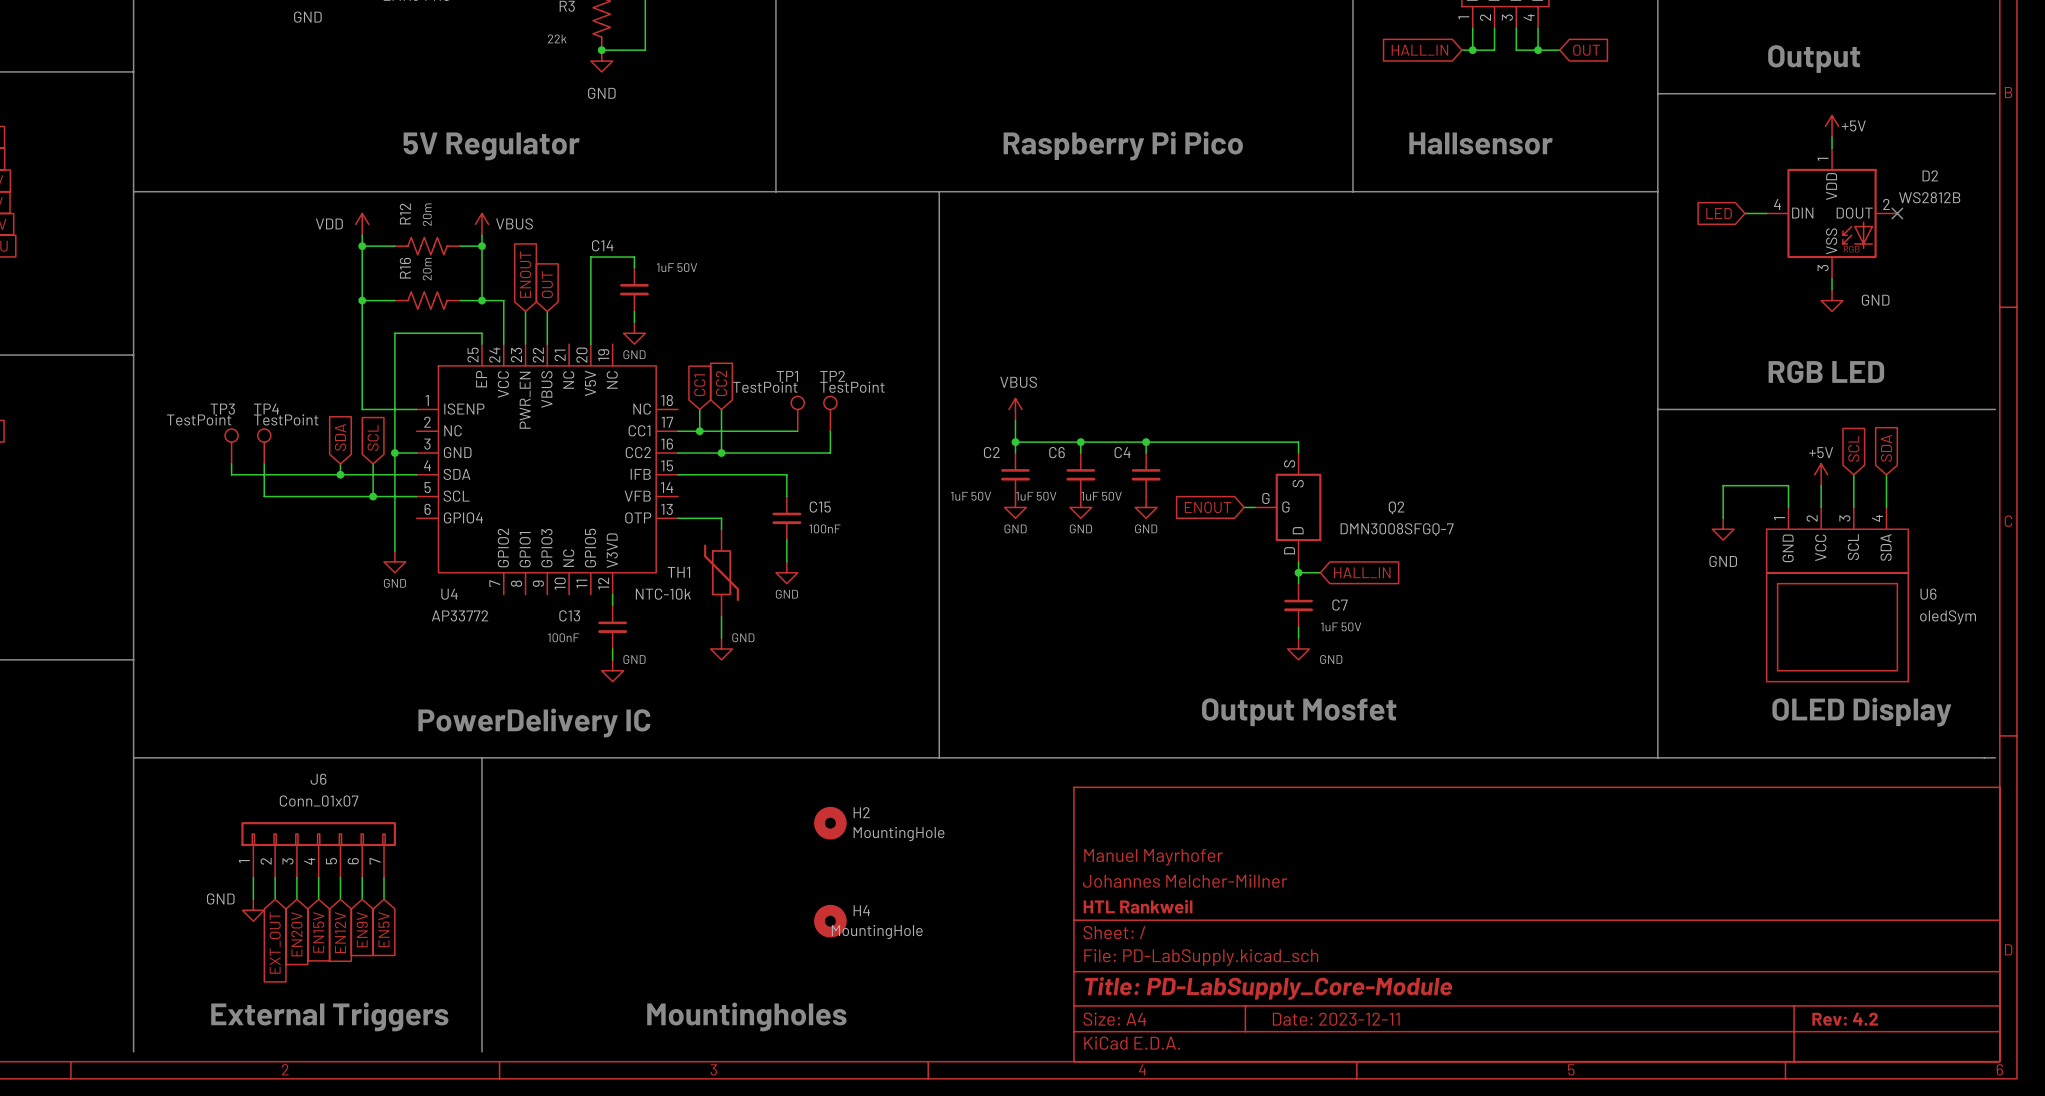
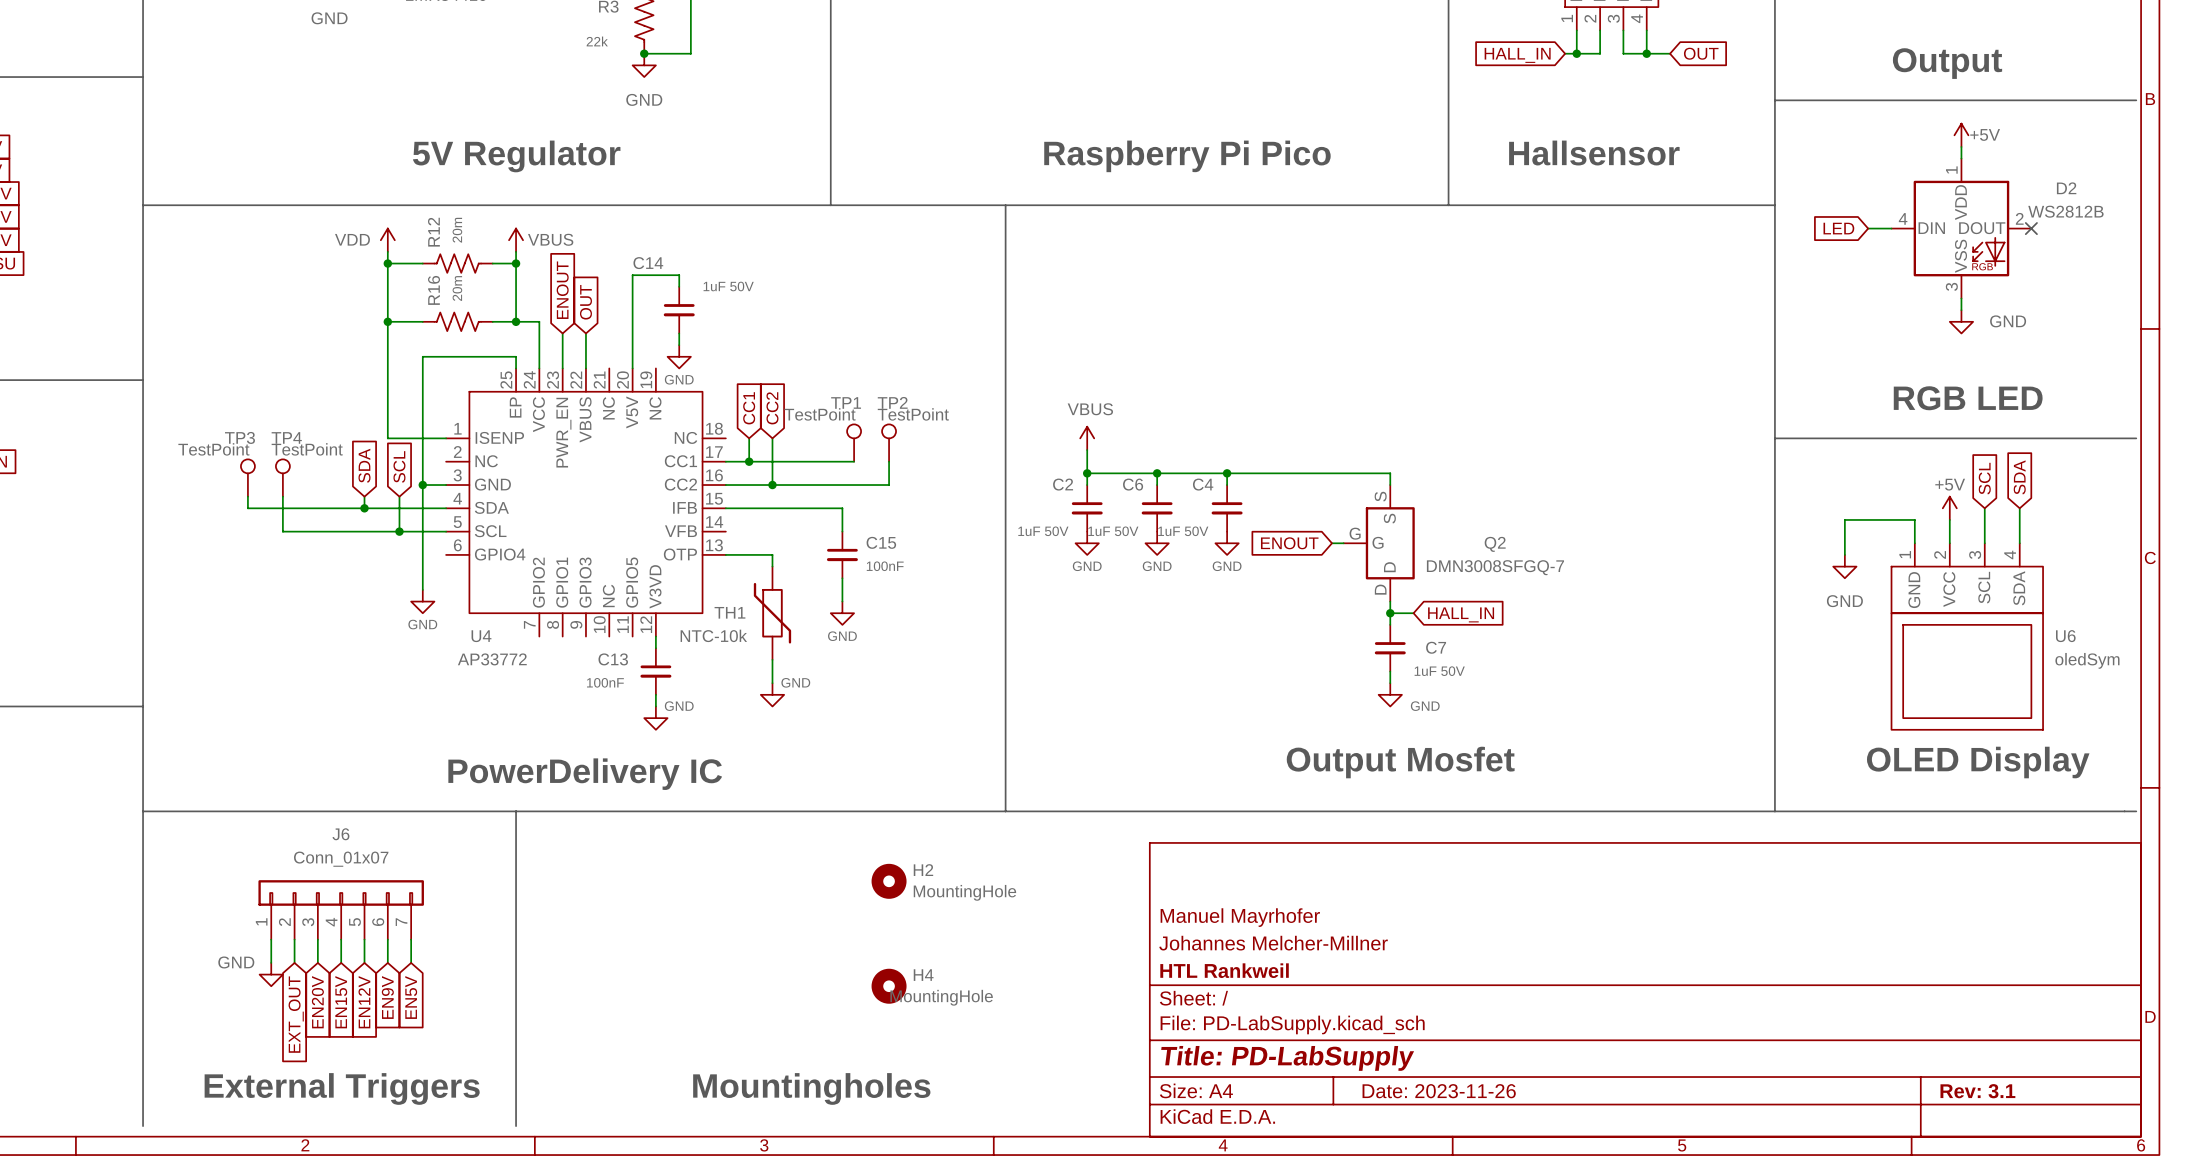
title block: Title: PD-LabSupply_Core-Module (1268, 988) -> Title: PD-LabSupply (1287, 1058)
title block: Date: 2023-12-11 (1336, 1019) -> Date: 2023-11-26 (1439, 1091)
title block: Rev: 4.2 (1845, 1019) -> Rev: 3.1 (1977, 1091)

